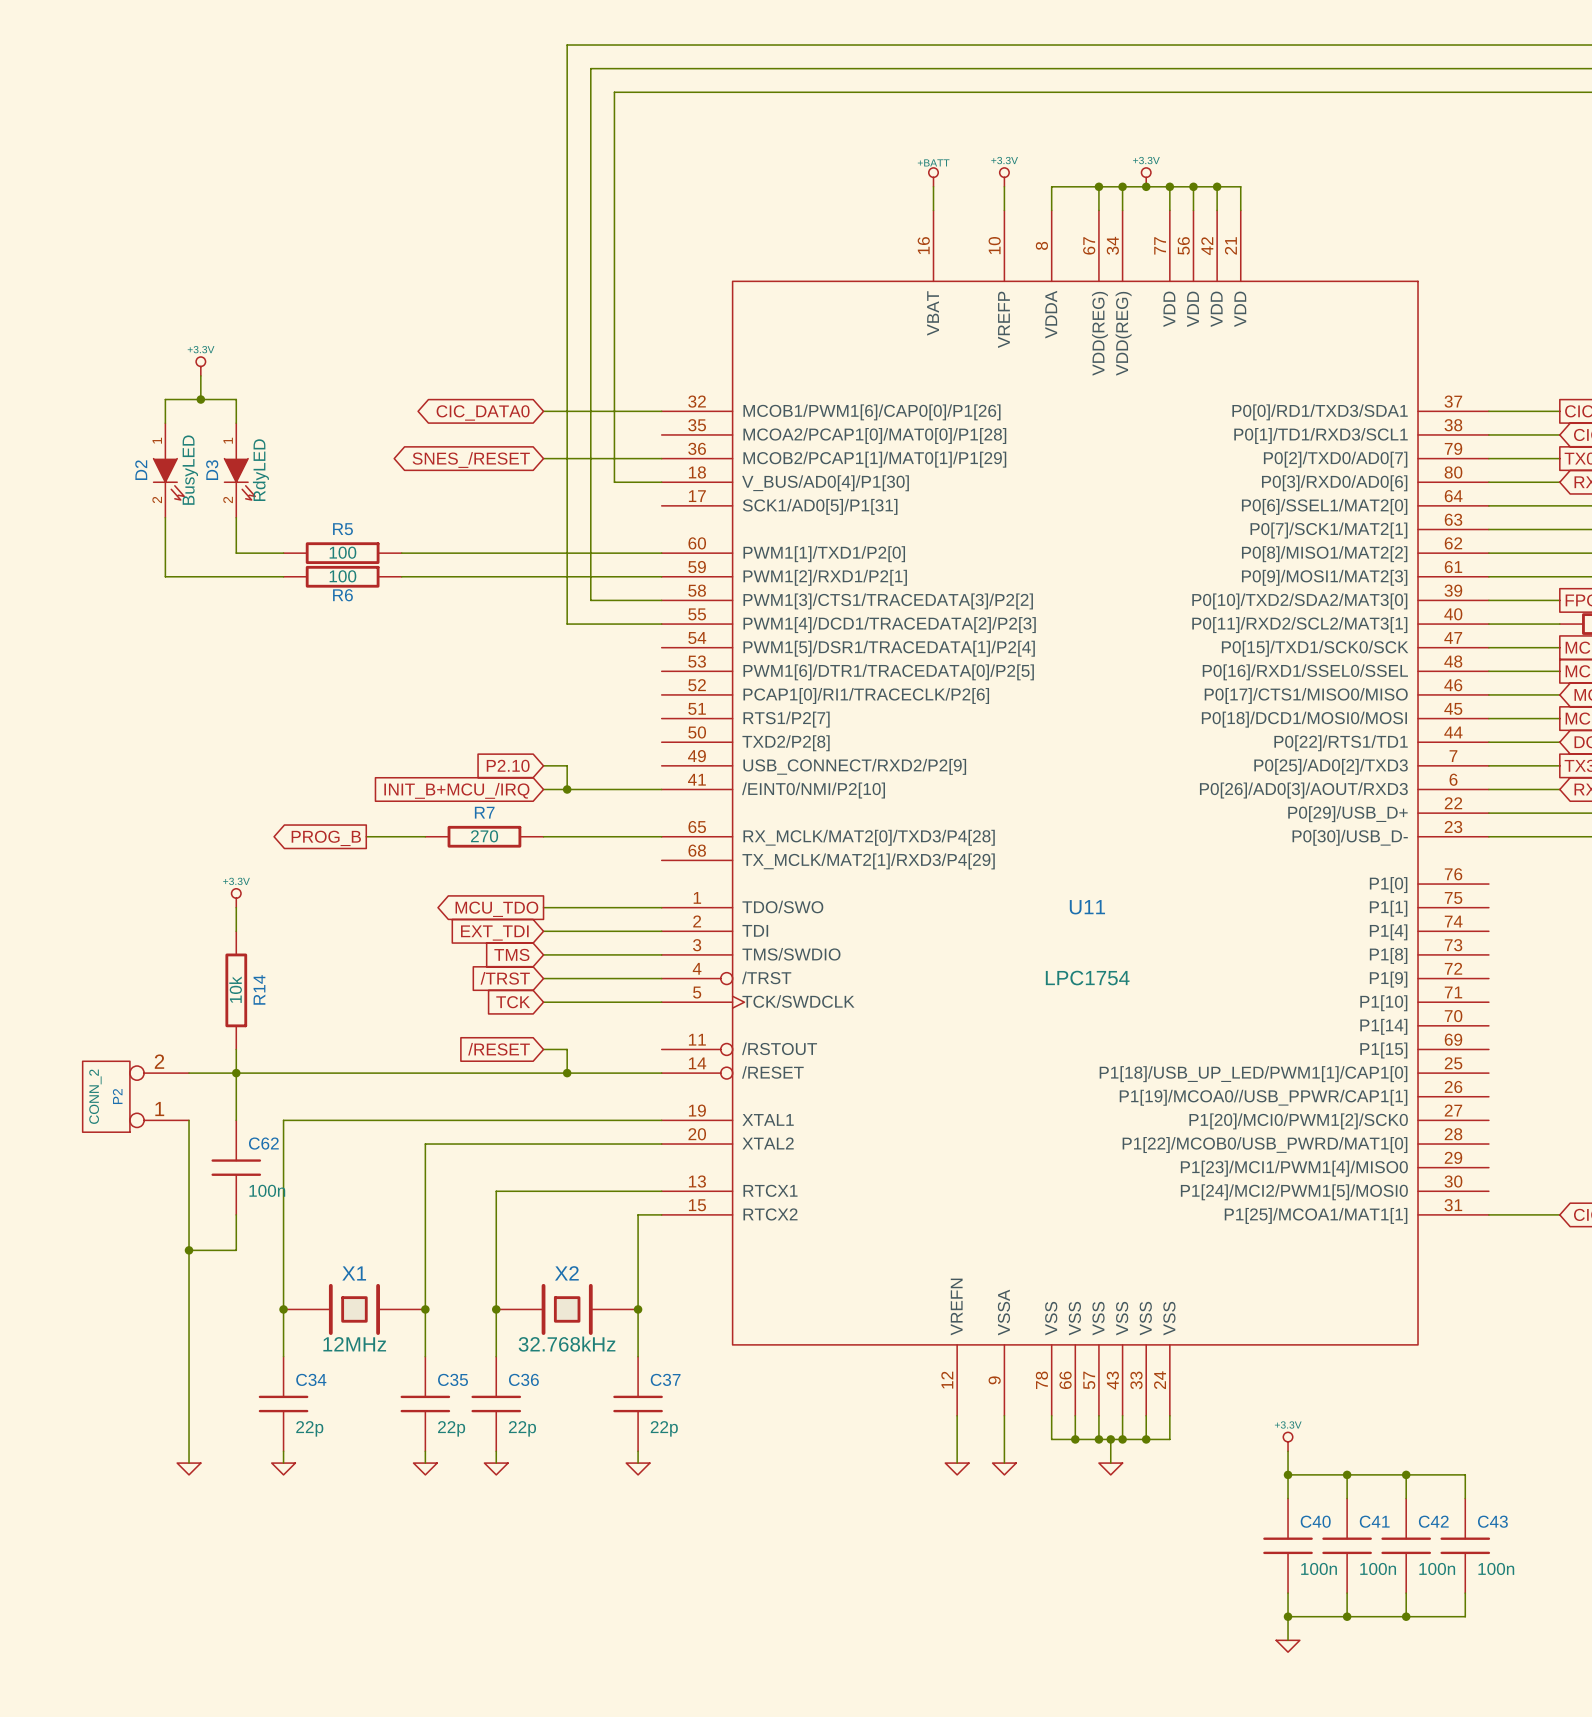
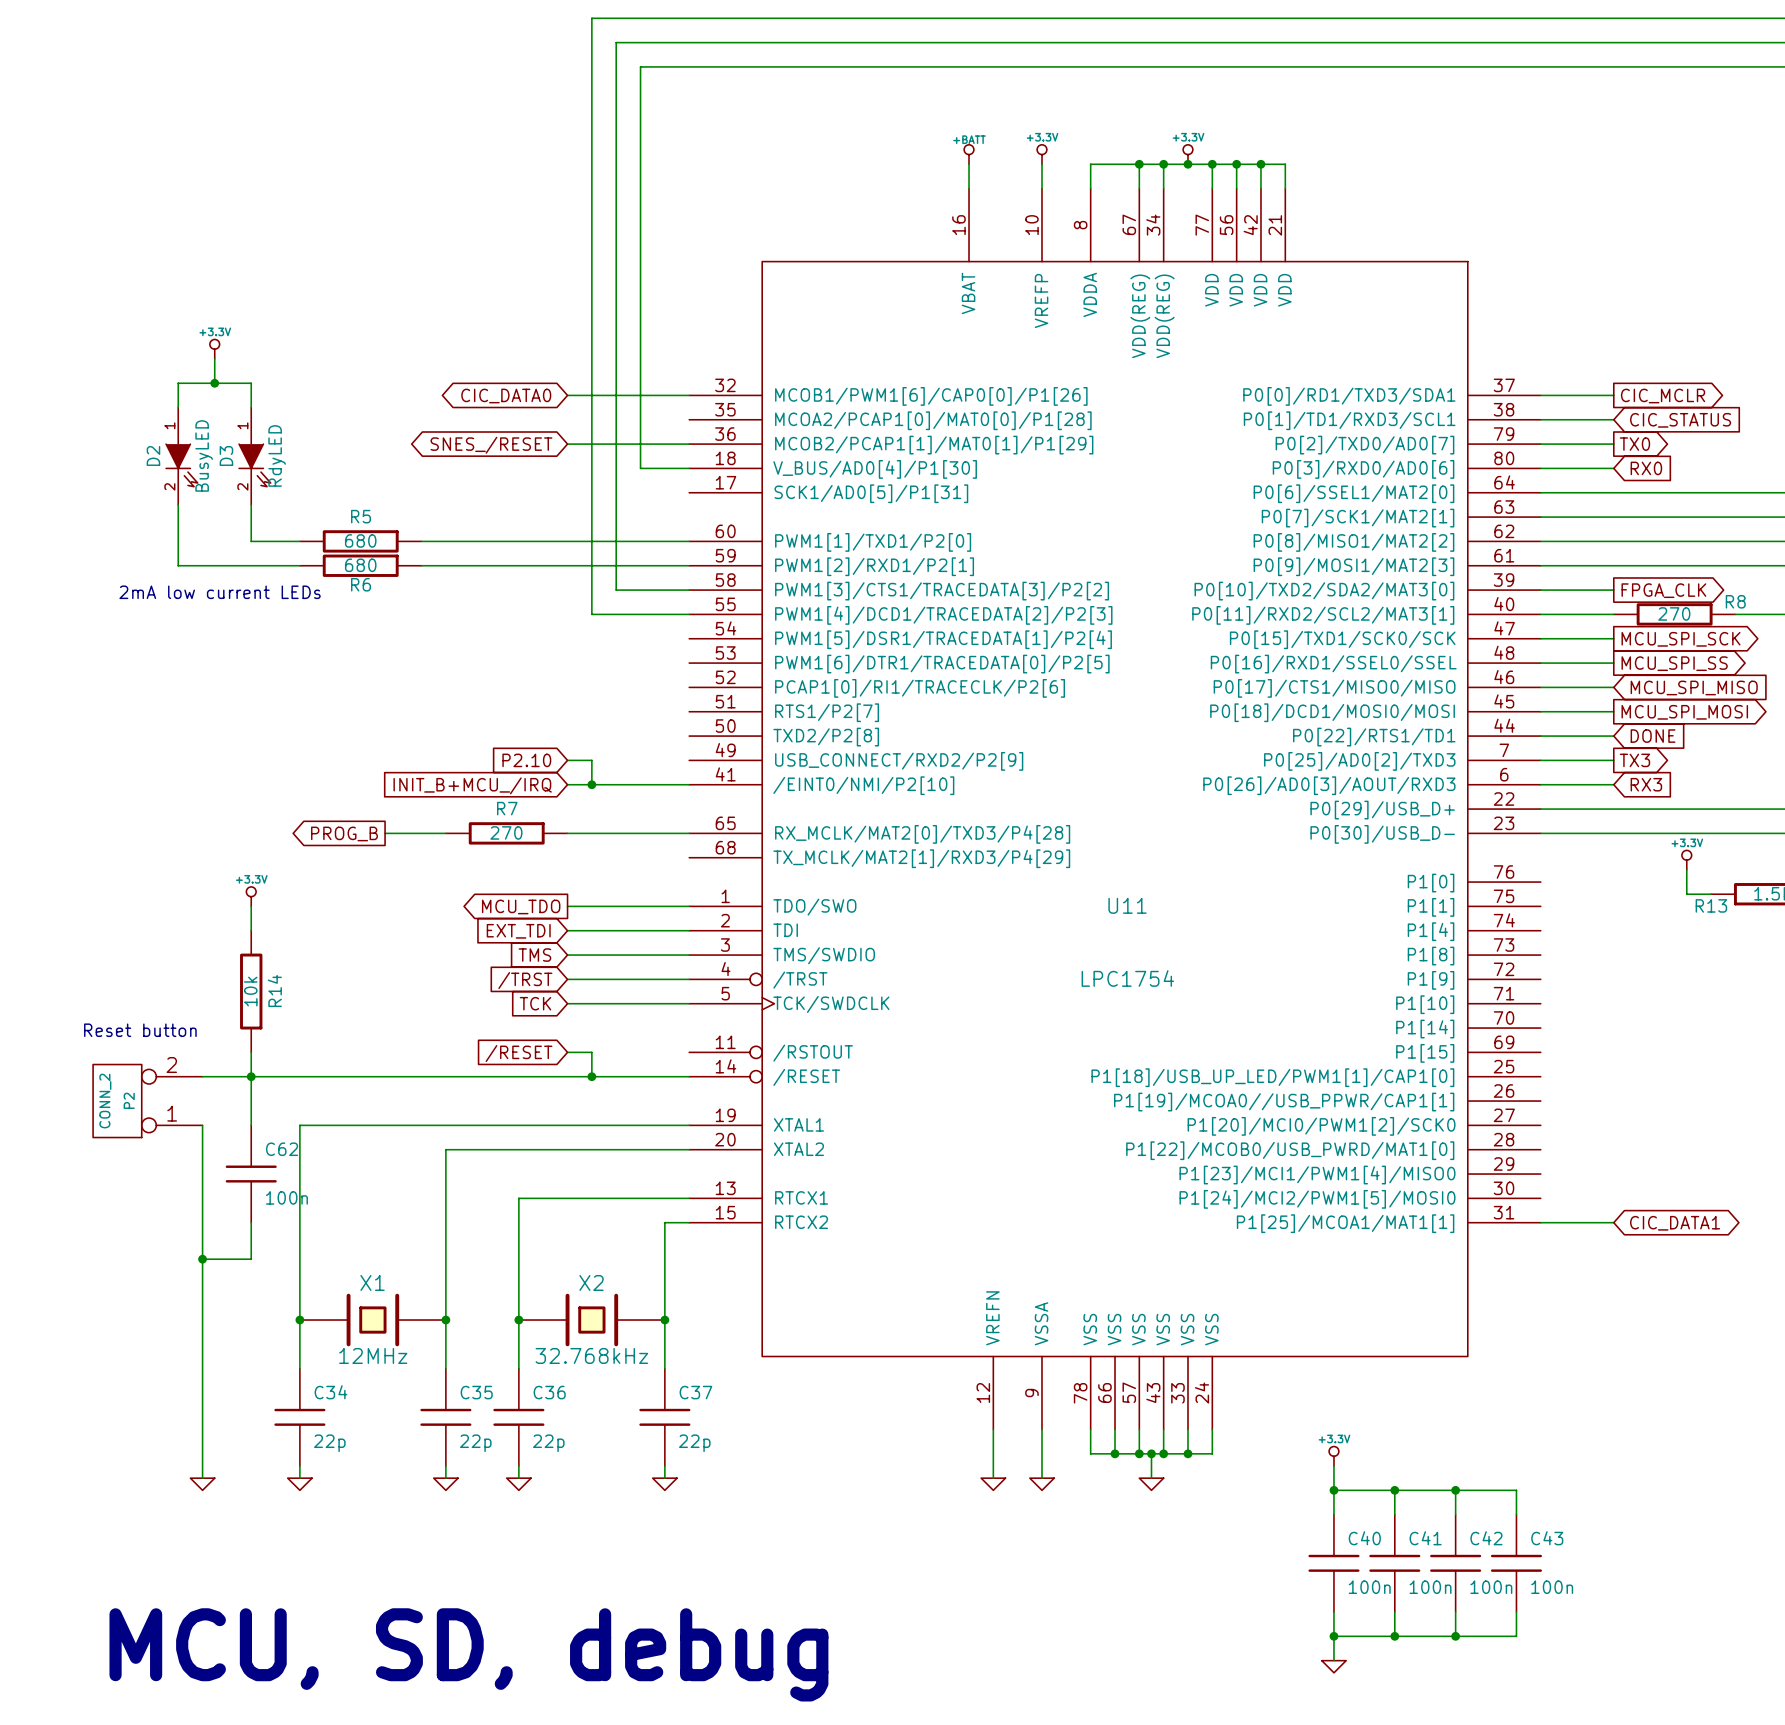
R5 value: 100 (342, 552) -> 680 (360, 540)
R6 value: 100 (342, 576) -> 680 (360, 565)
text: none -> 2mA low current LEDs (220, 592)
text: none -> Reset button (140, 1030)
text: none -> MCU, SD, debug (468, 1654)

